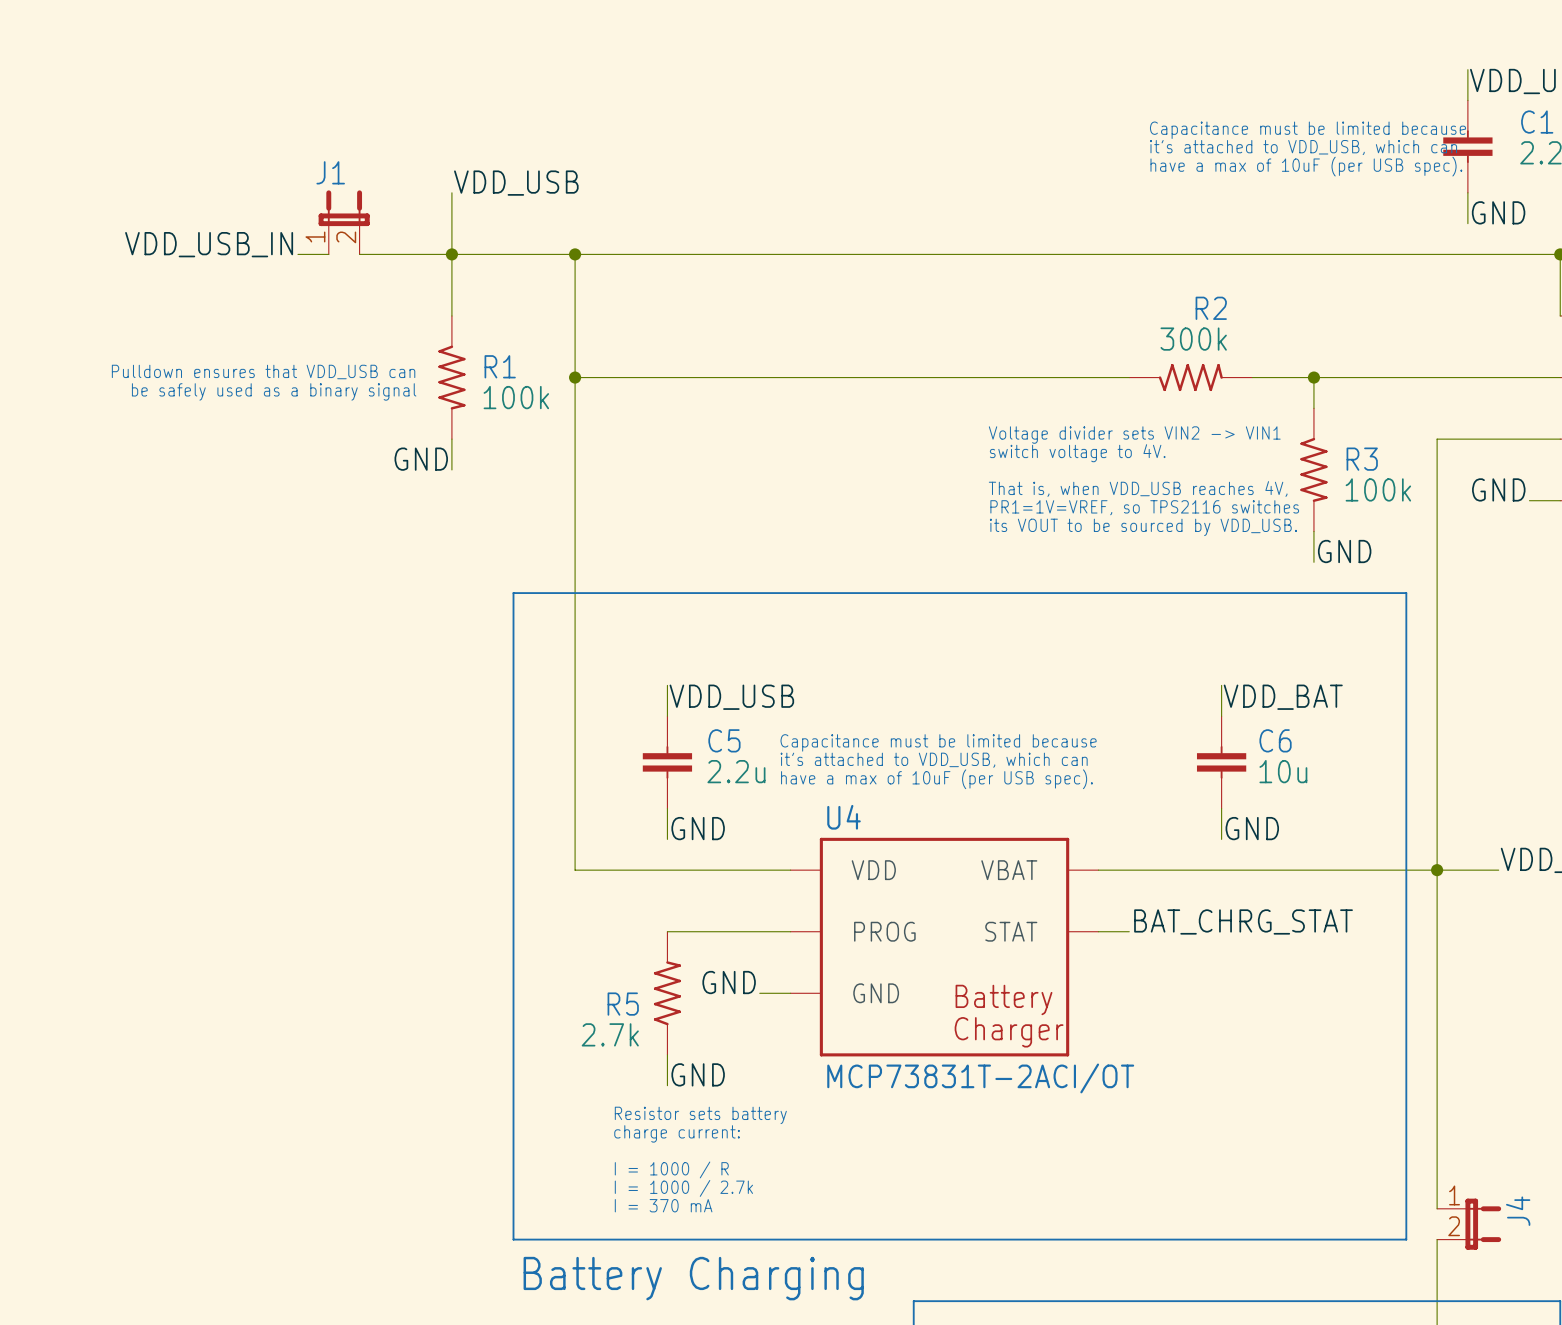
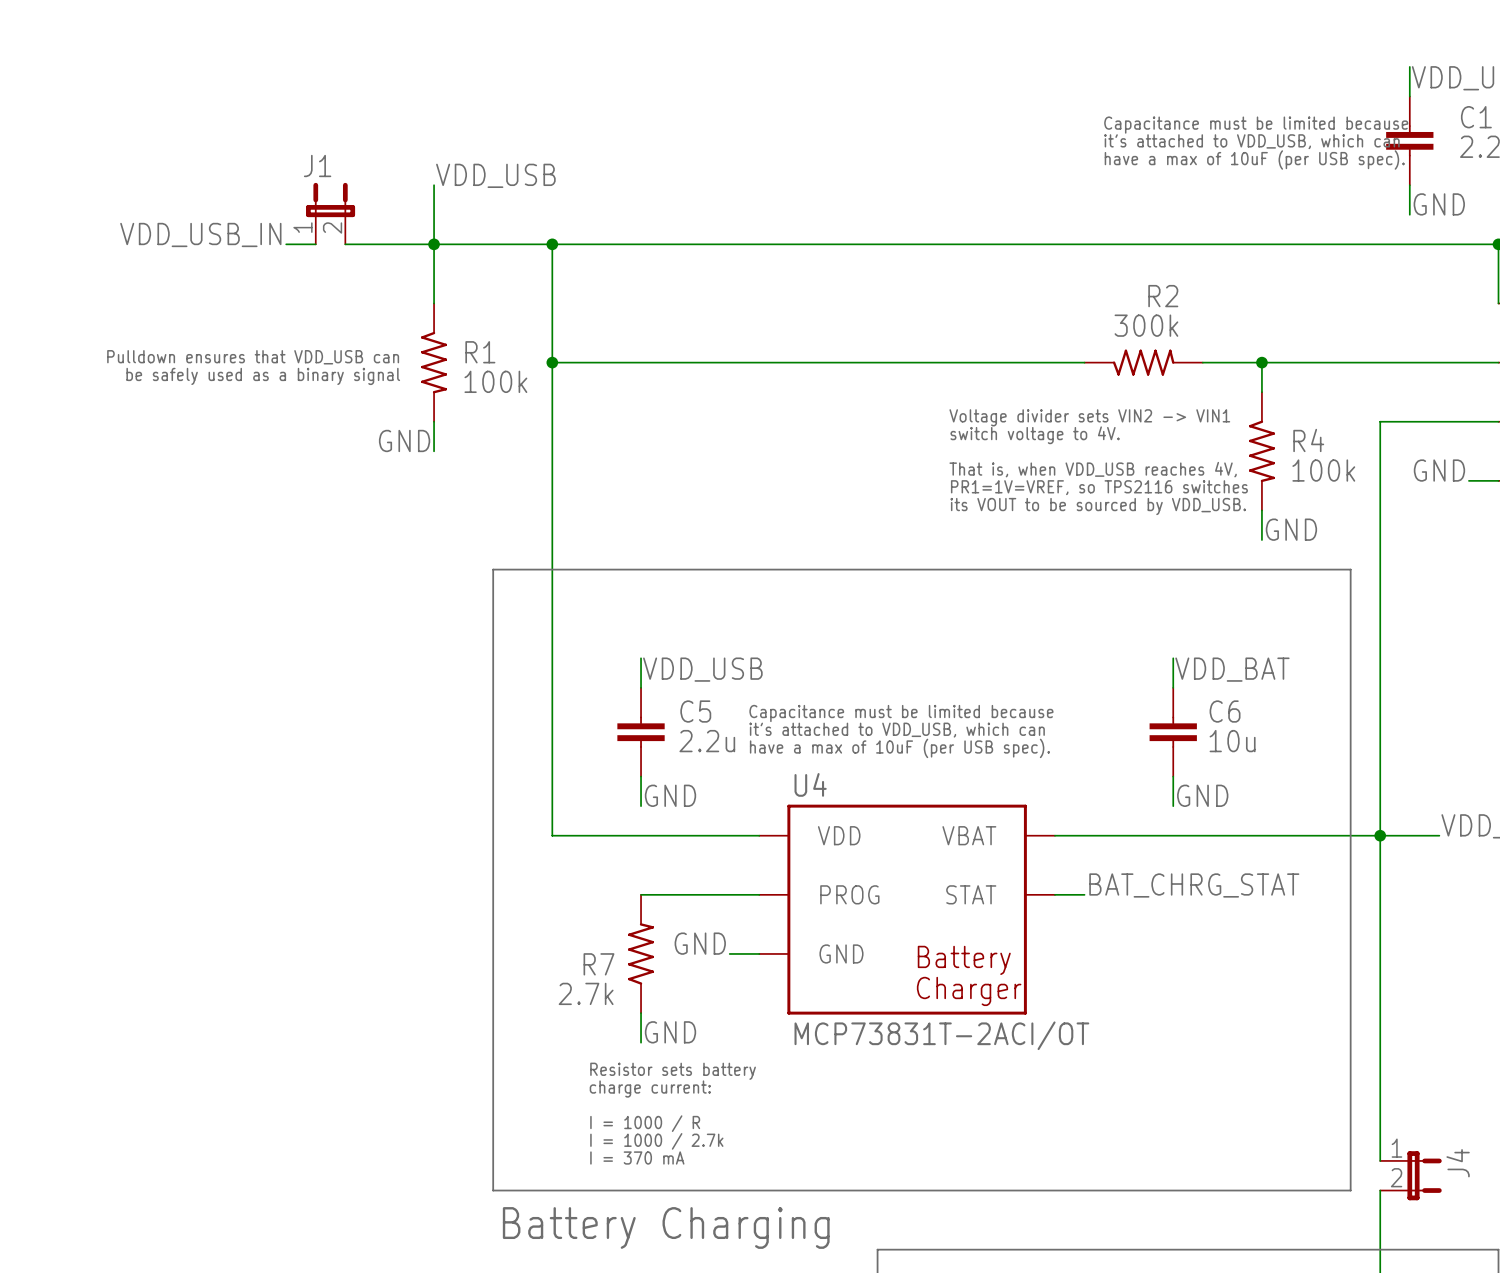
R3 name: R3 (1362, 459) -> R4 (1308, 440)
R5 name: R5 (623, 1004) -> R7 (598, 964)

